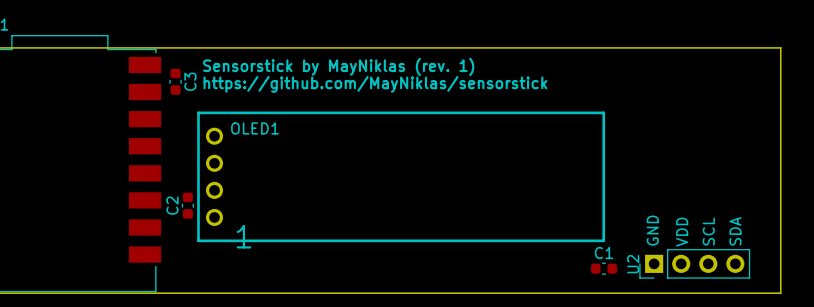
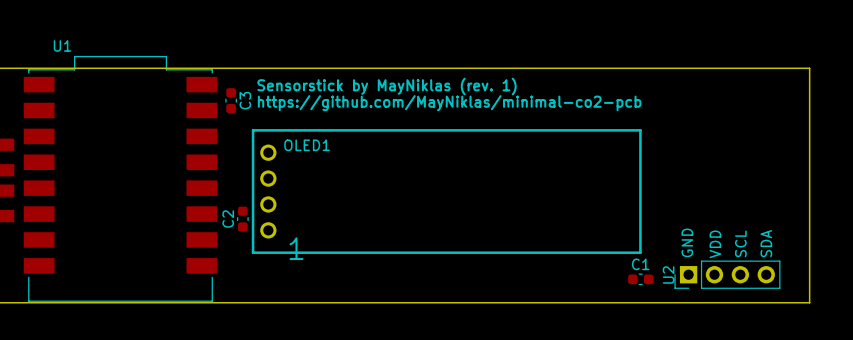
text: https://github.com/MayNiklas/sensorstick (375, 84) -> https://github.com/MayNiklas/minimal-co2-pcb (449, 103)

